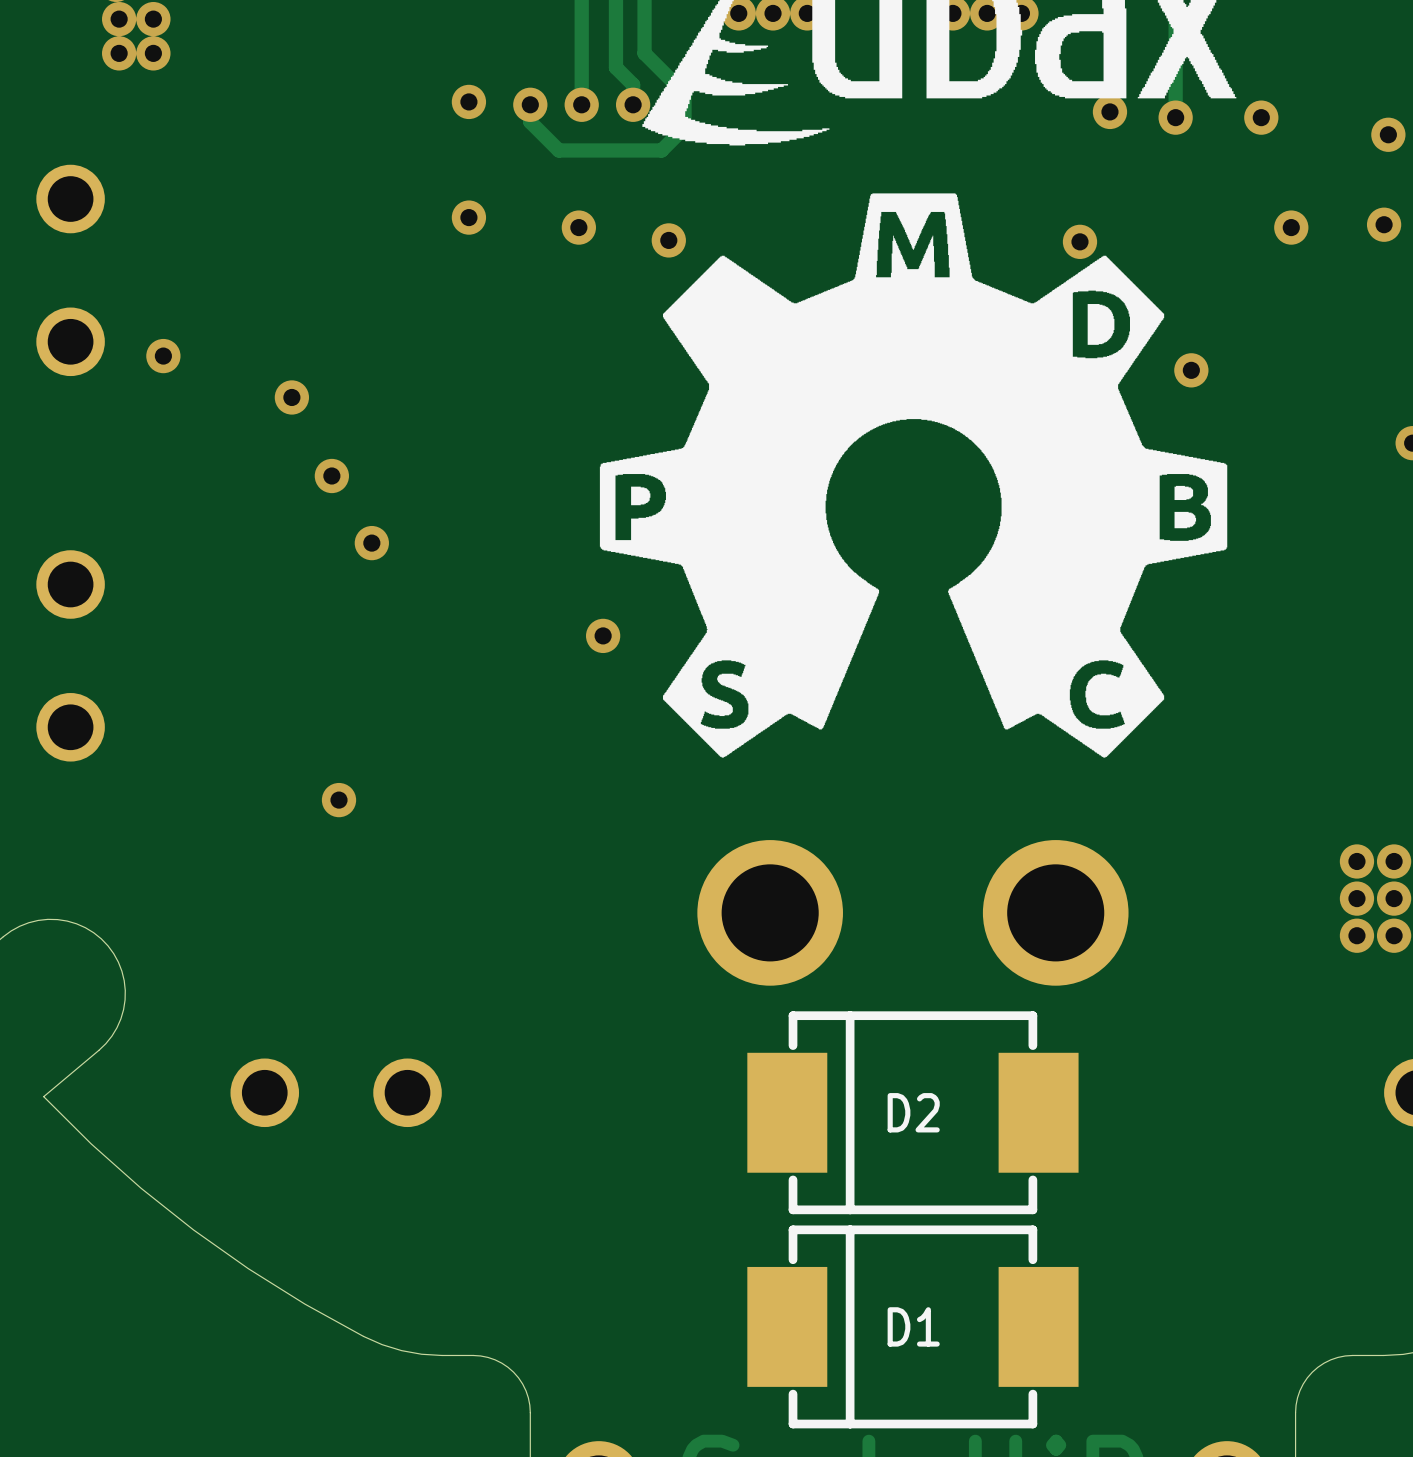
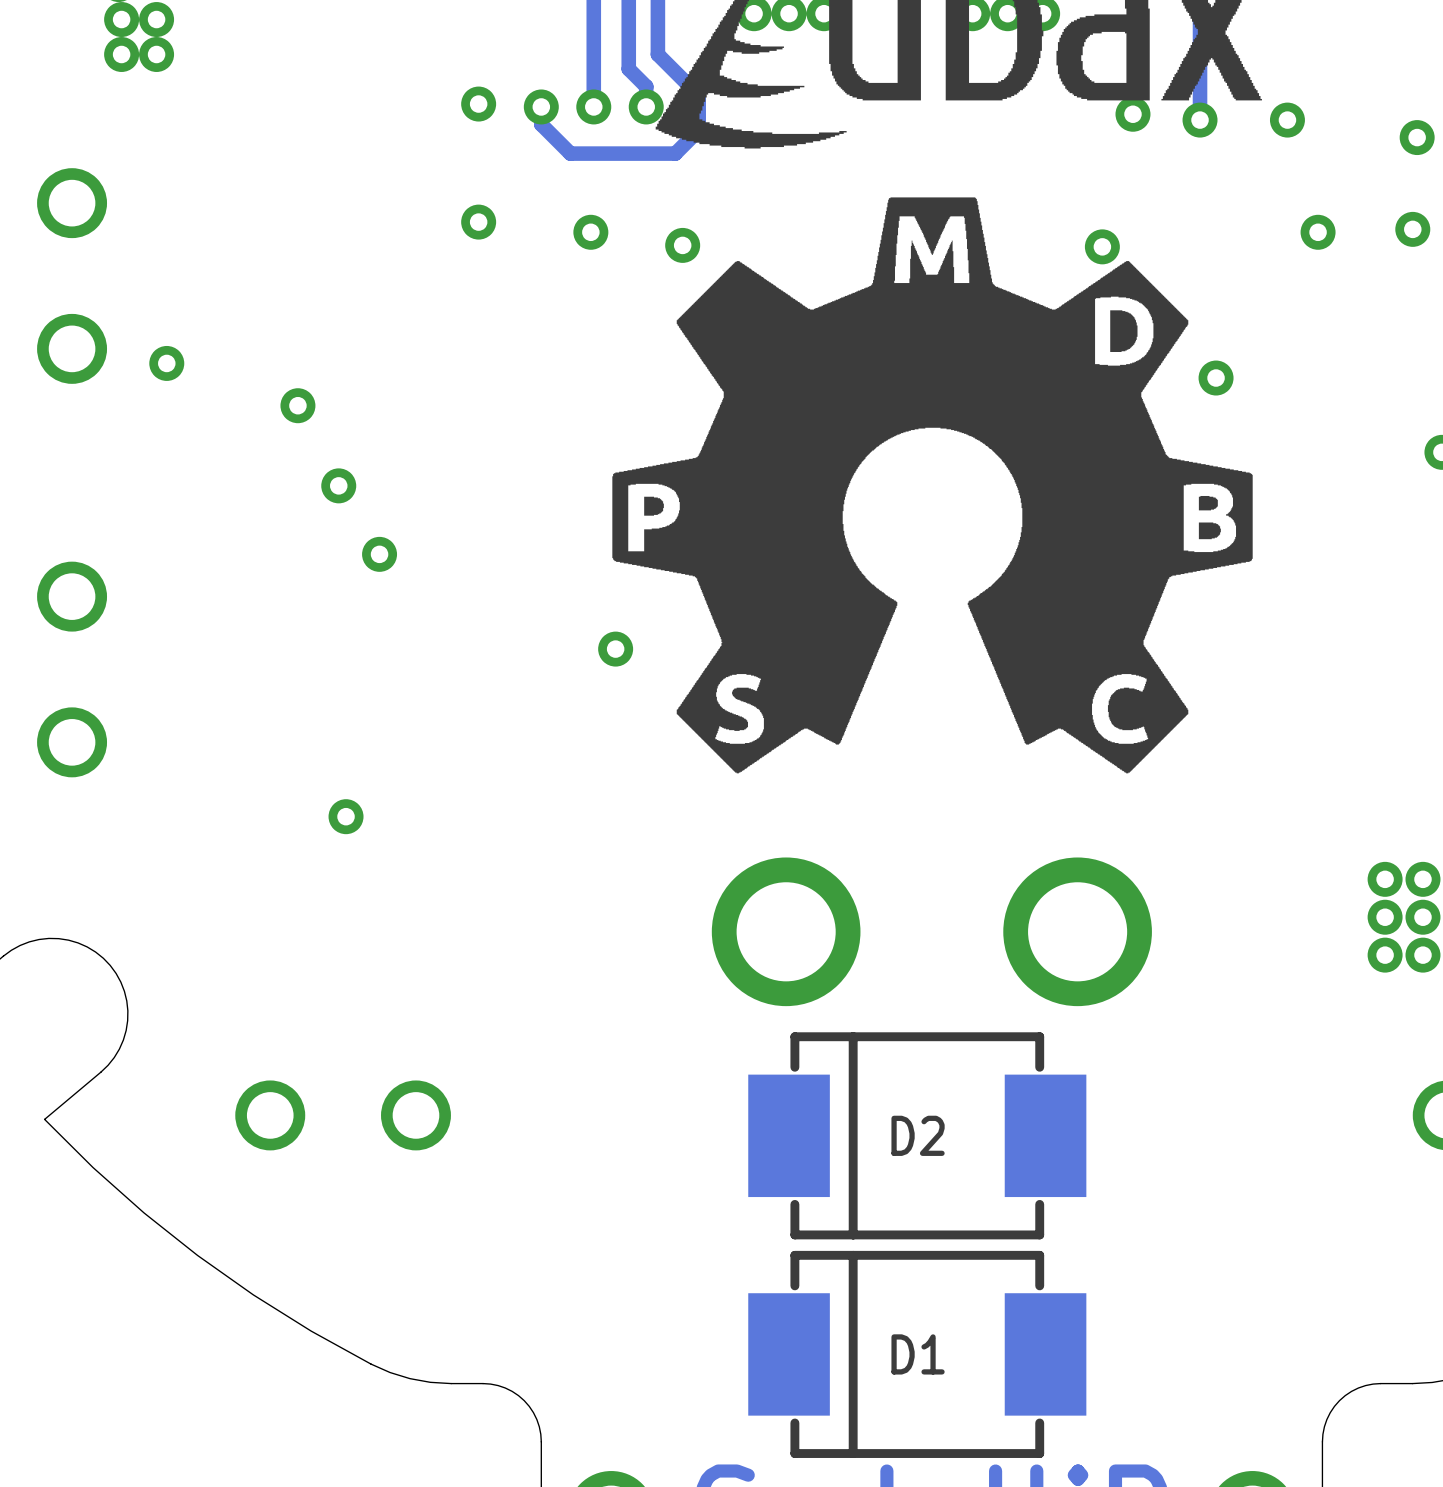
D2 position: (912, 1112) -> (917, 1135)
D1 position: (912, 1326) -> (917, 1354)

